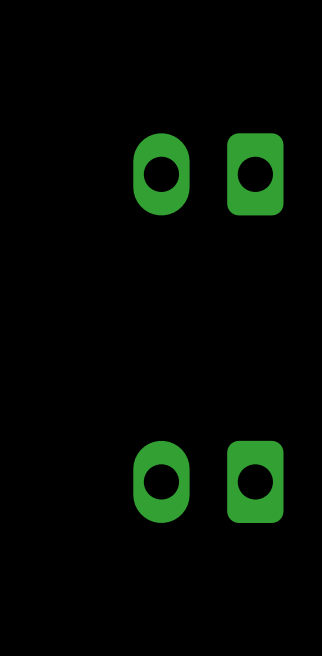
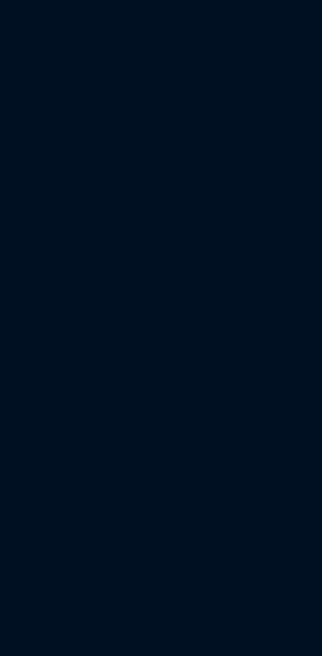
part: (208, 174) -> none
part: (208, 481) -> none

